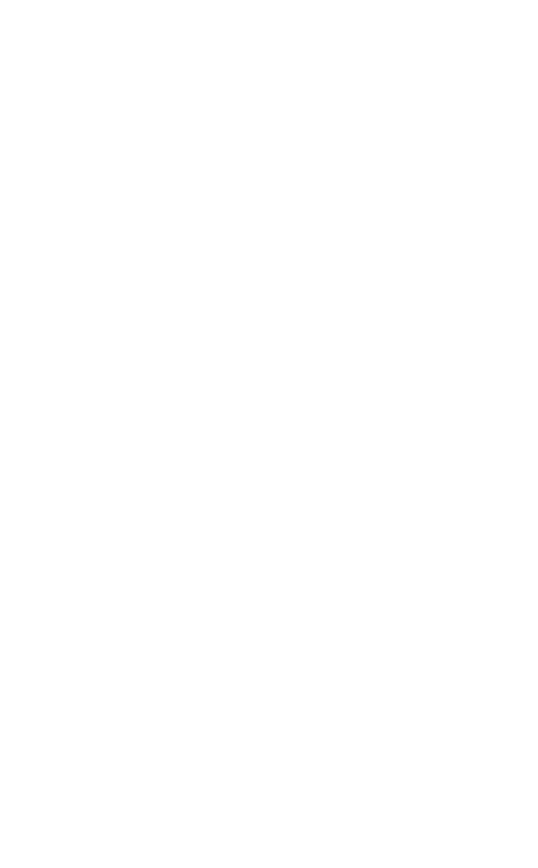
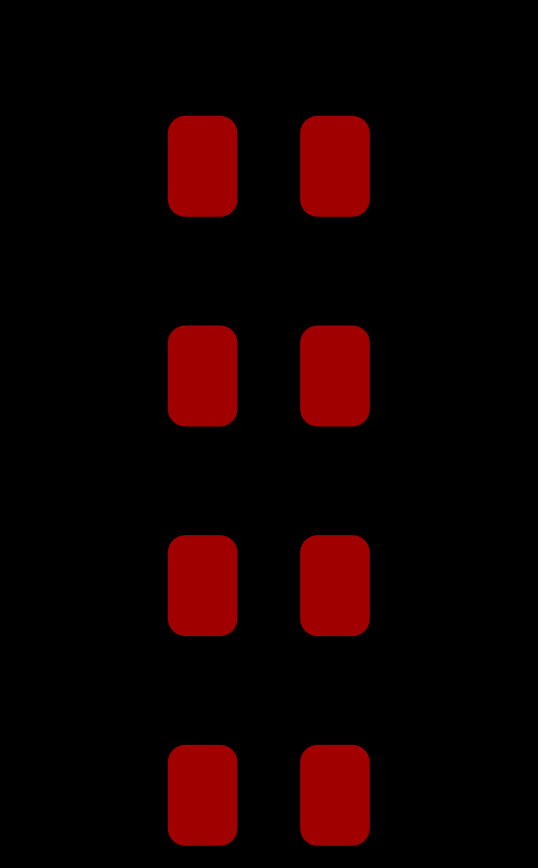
part: none -> (268, 166)
part: none -> (268, 375)
part: none -> (268, 585)
part: none -> (268, 795)

